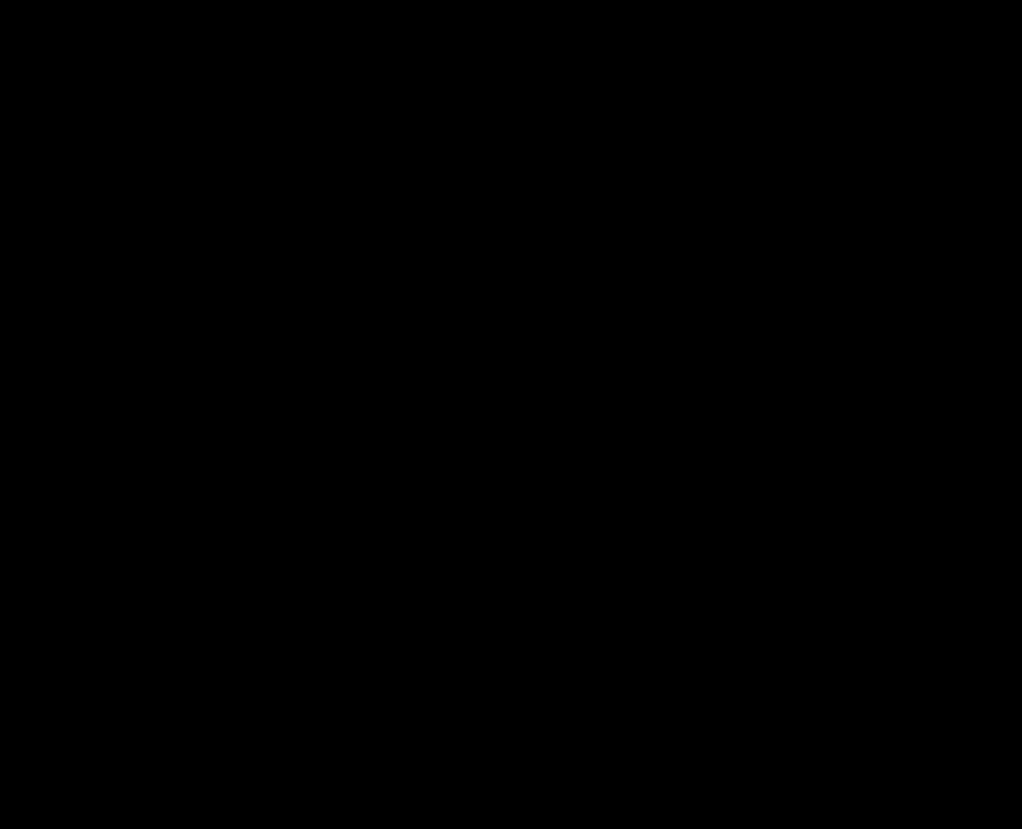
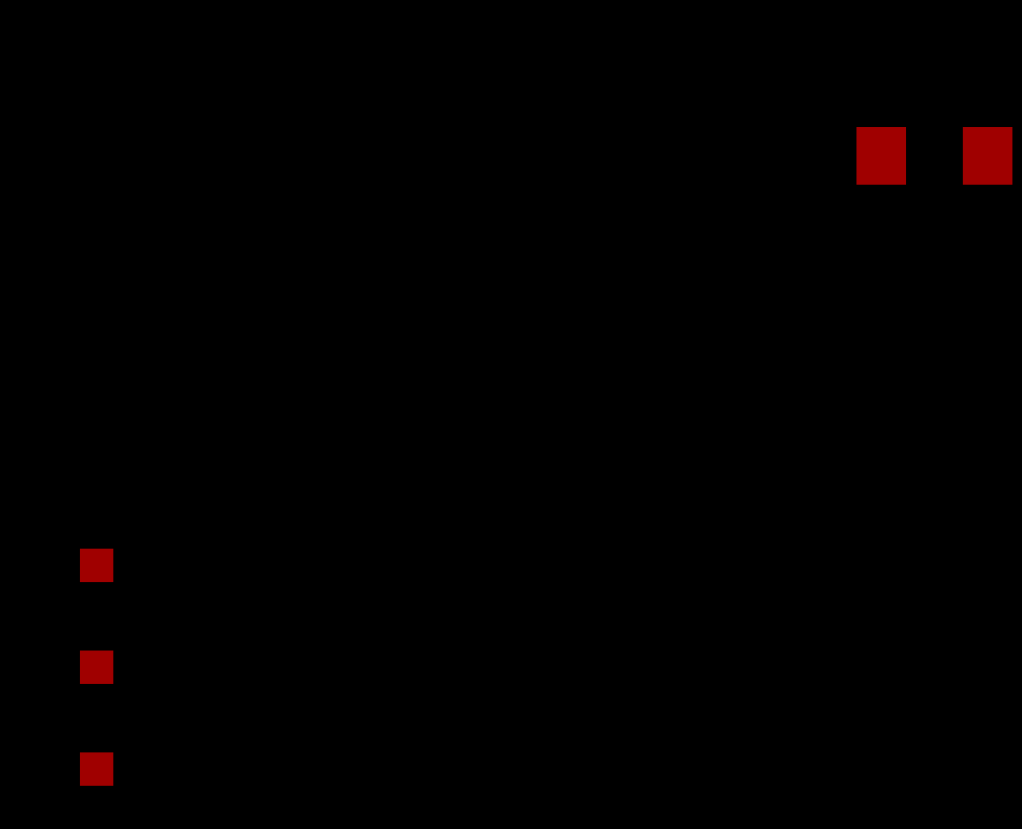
part: none -> (934, 155)
part: none -> (96, 565)
part: none -> (96, 667)
part: none -> (96, 769)

